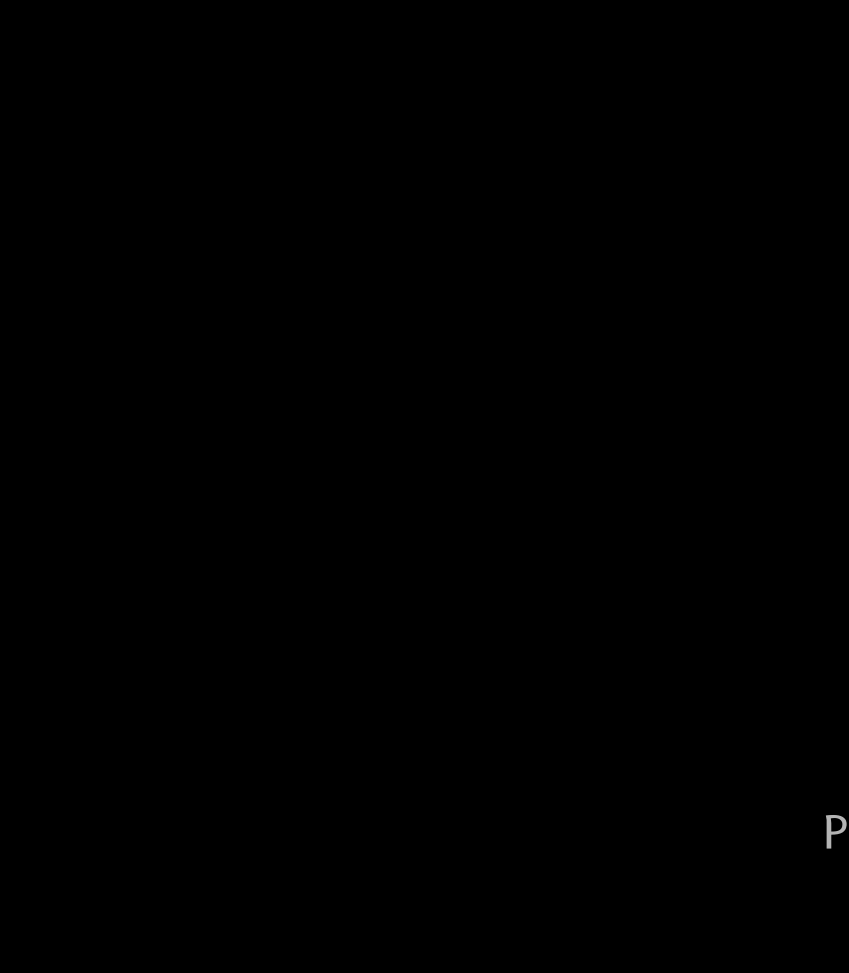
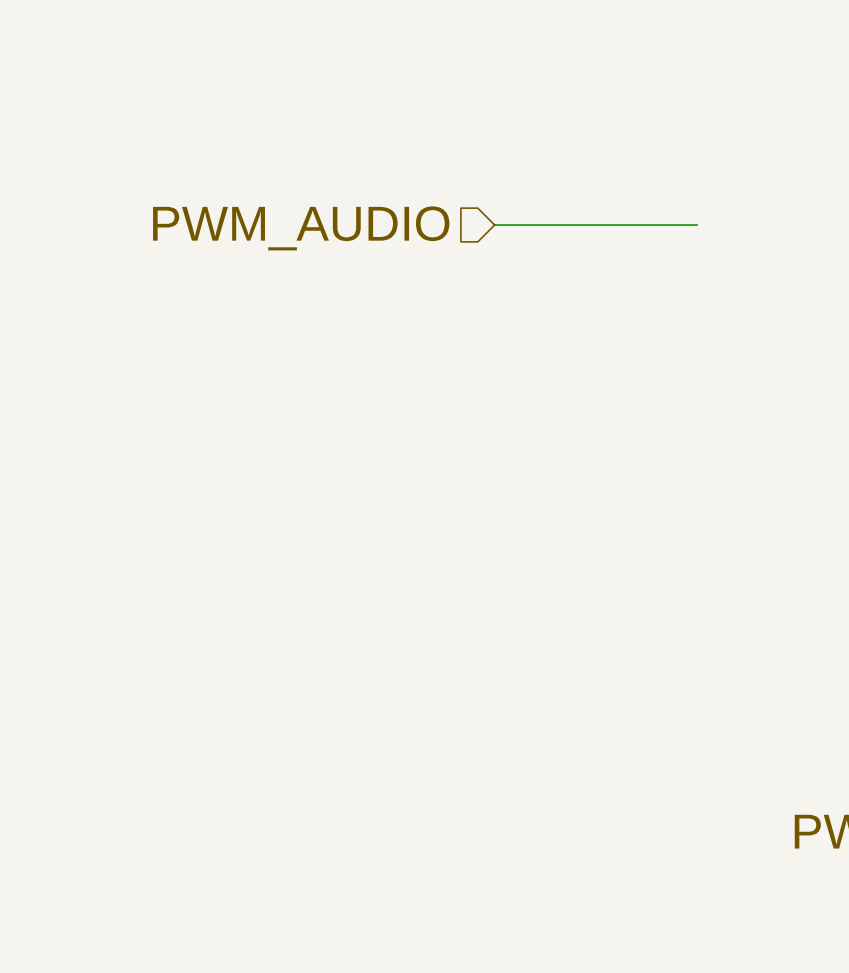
wire: none -> (494, 225) (697, 225)
hierarchical label: none -> PWM_AUDIO (301, 228)

